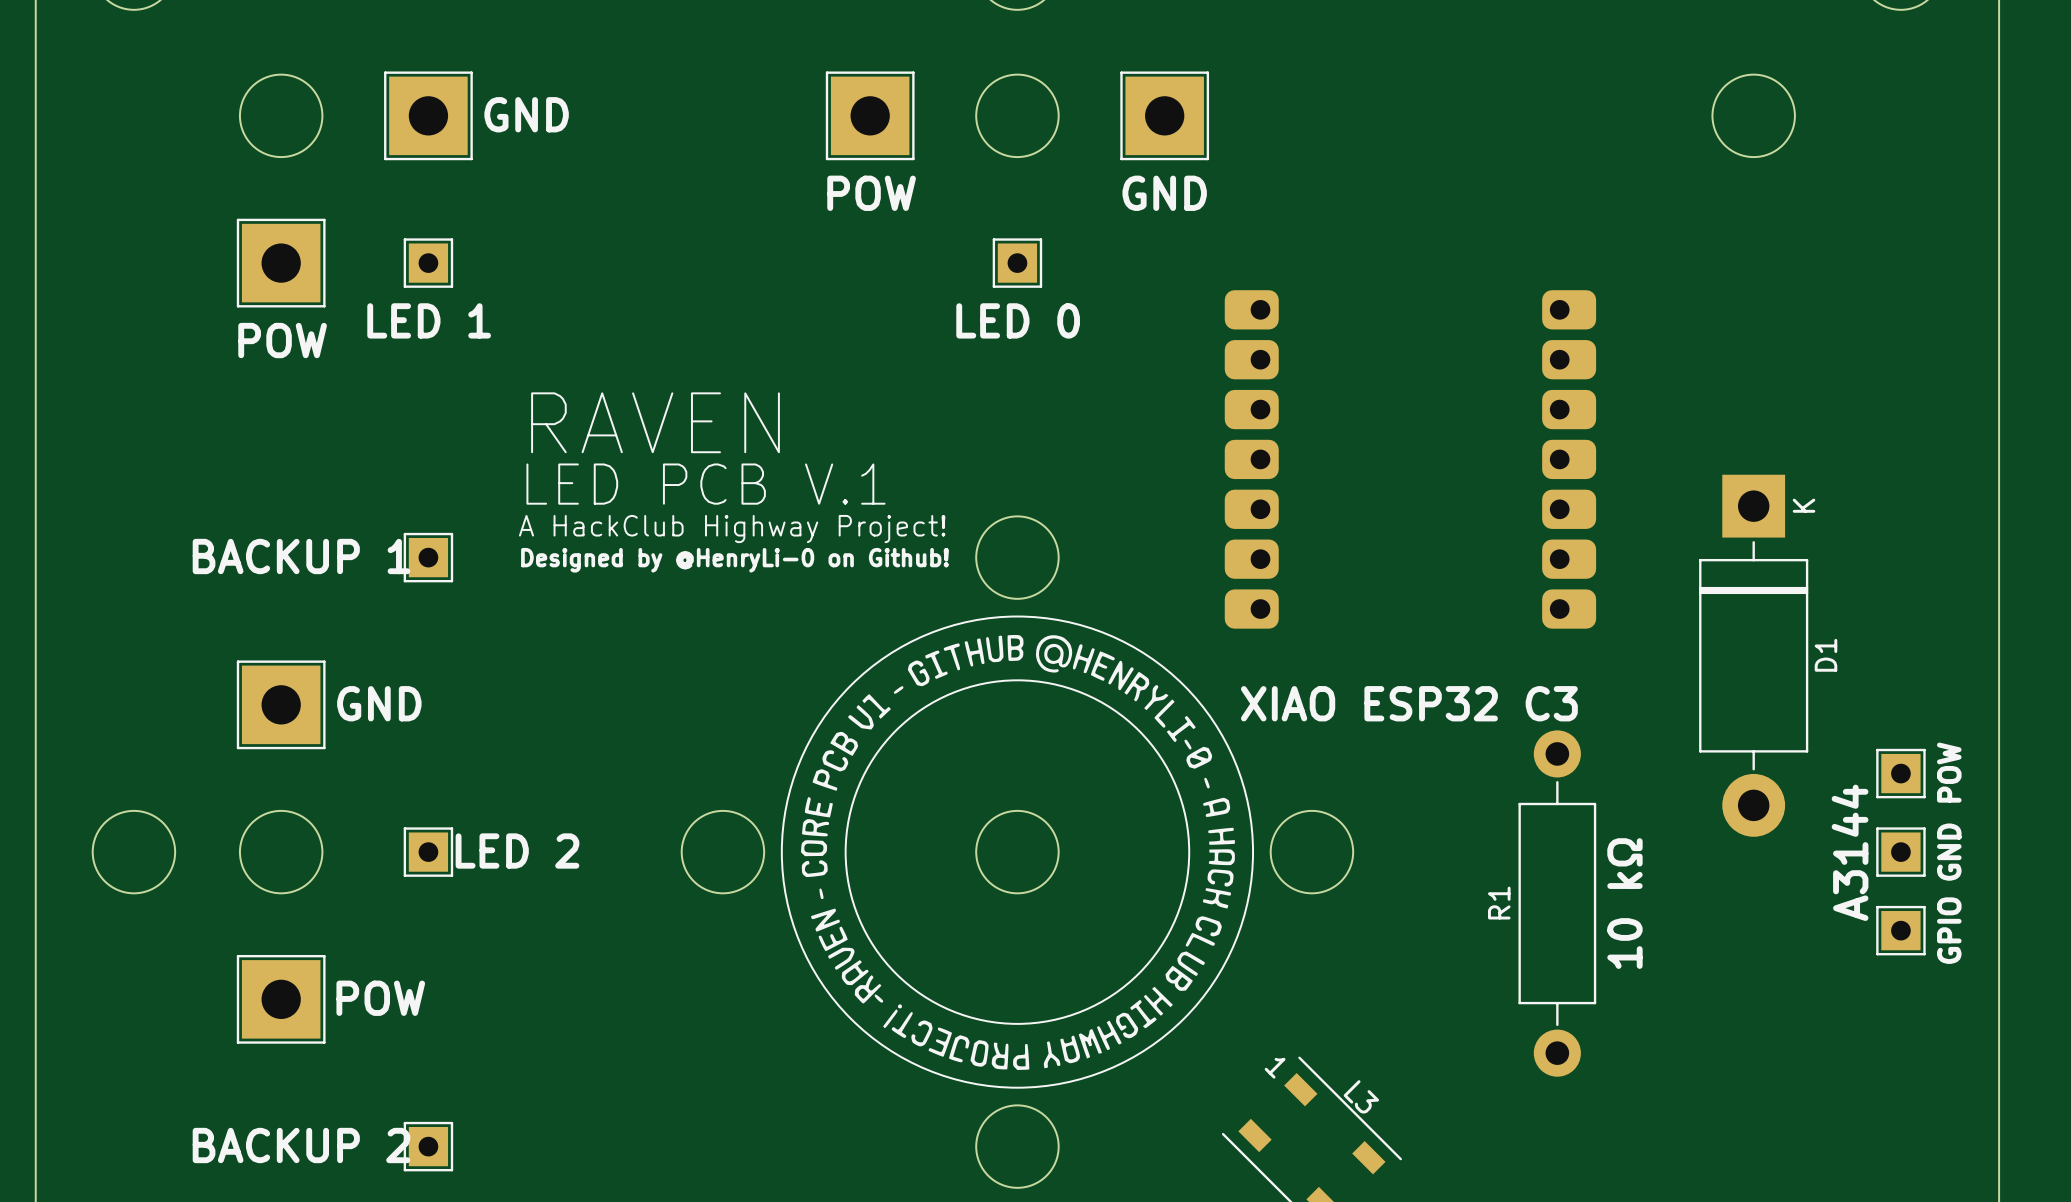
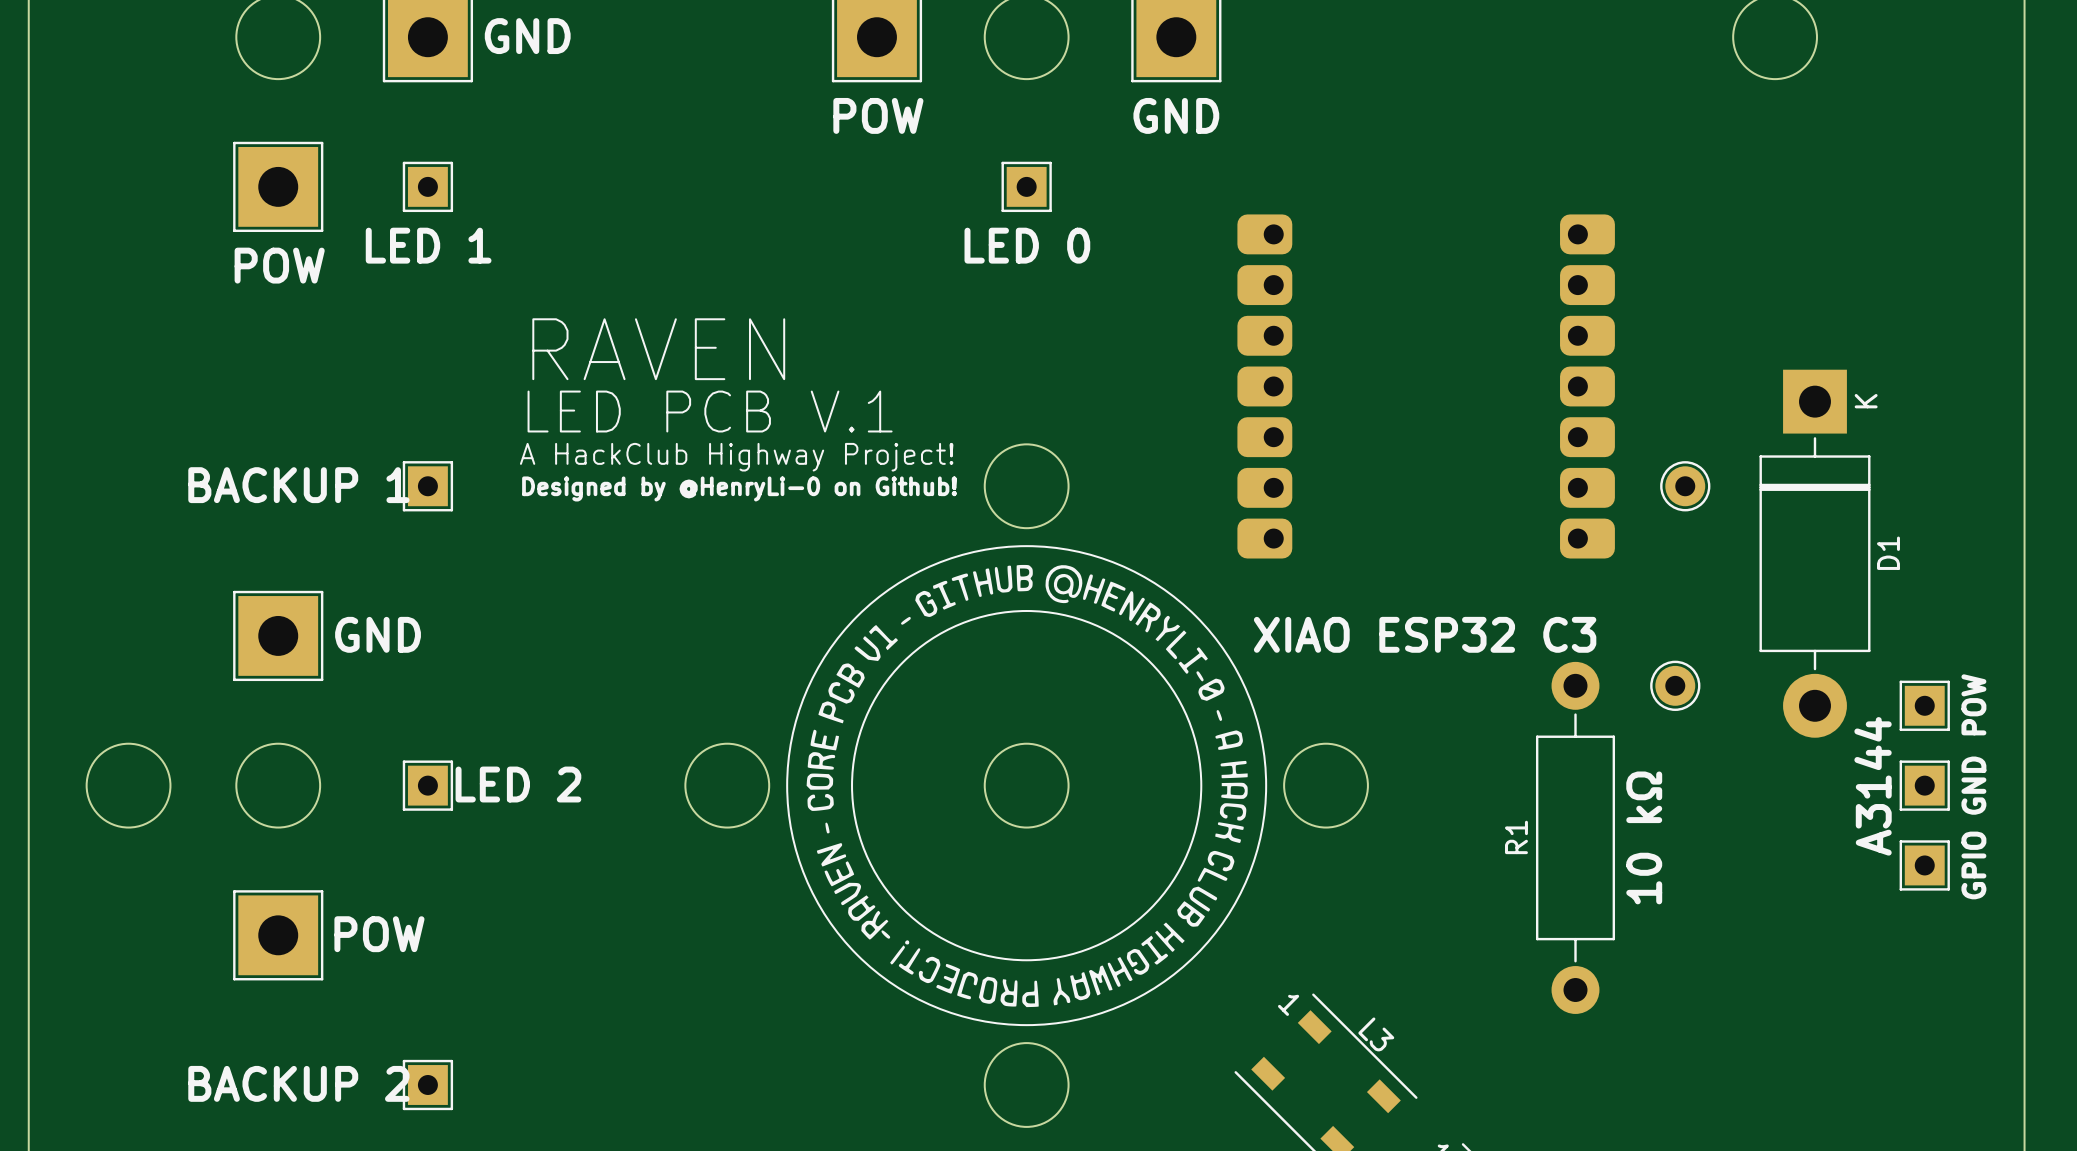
part: none -> (1685, 486)
D1 position: (1753, 655) -> (1814, 553)
part: none -> (1675, 685)

